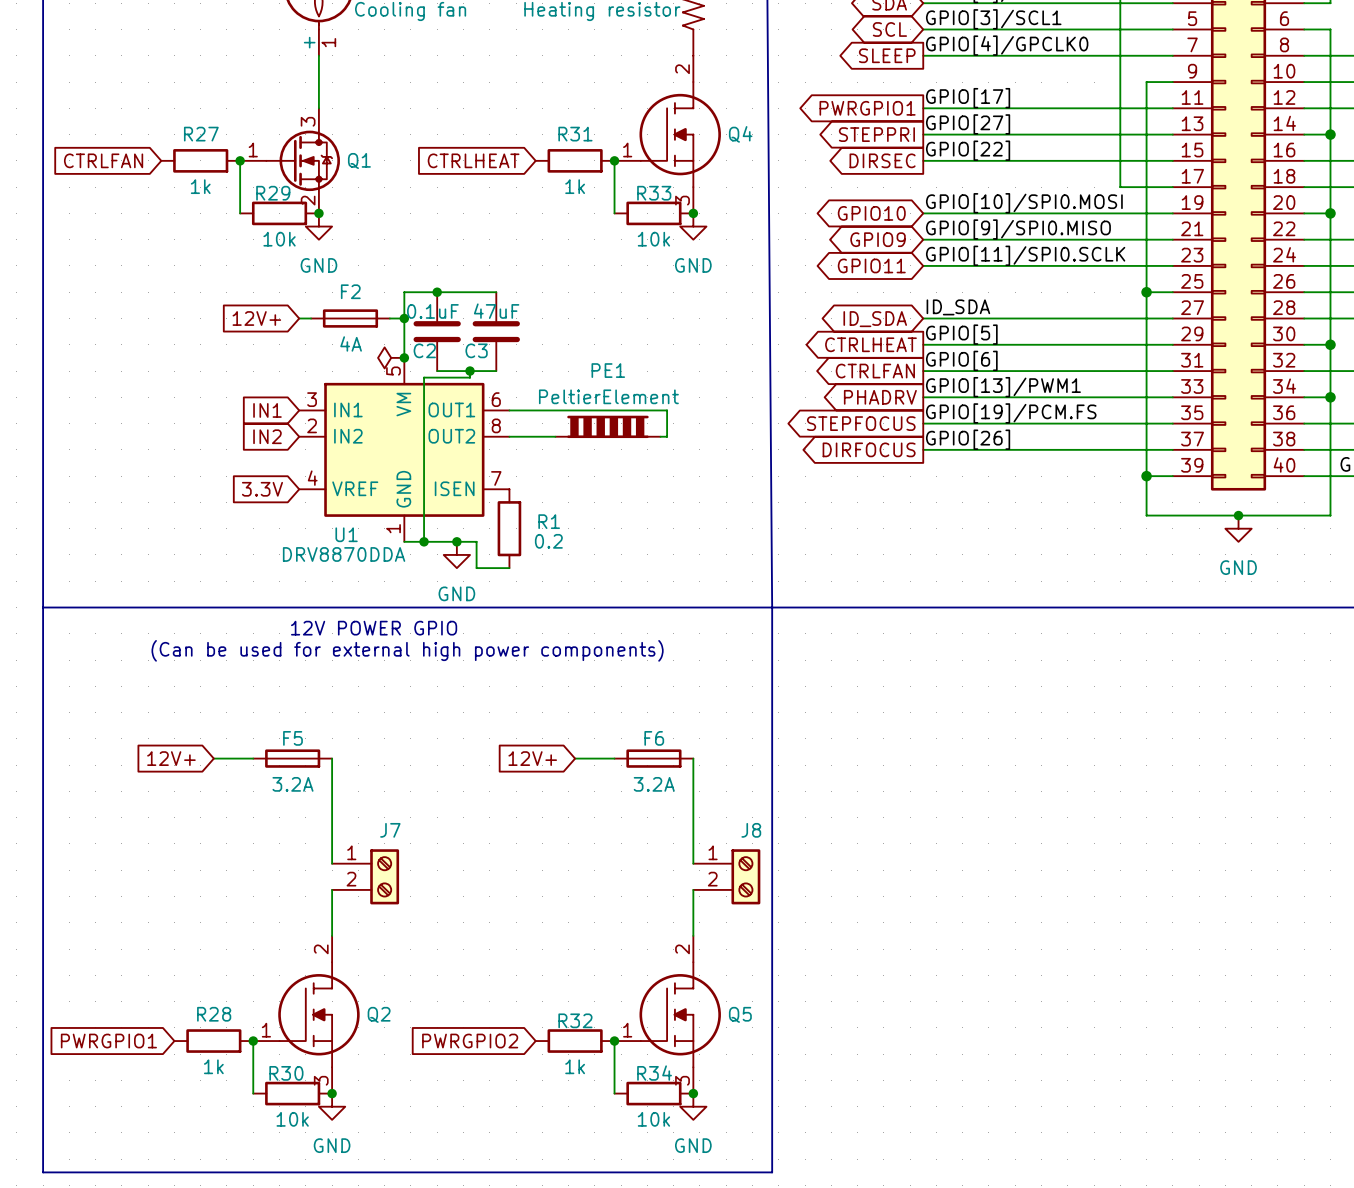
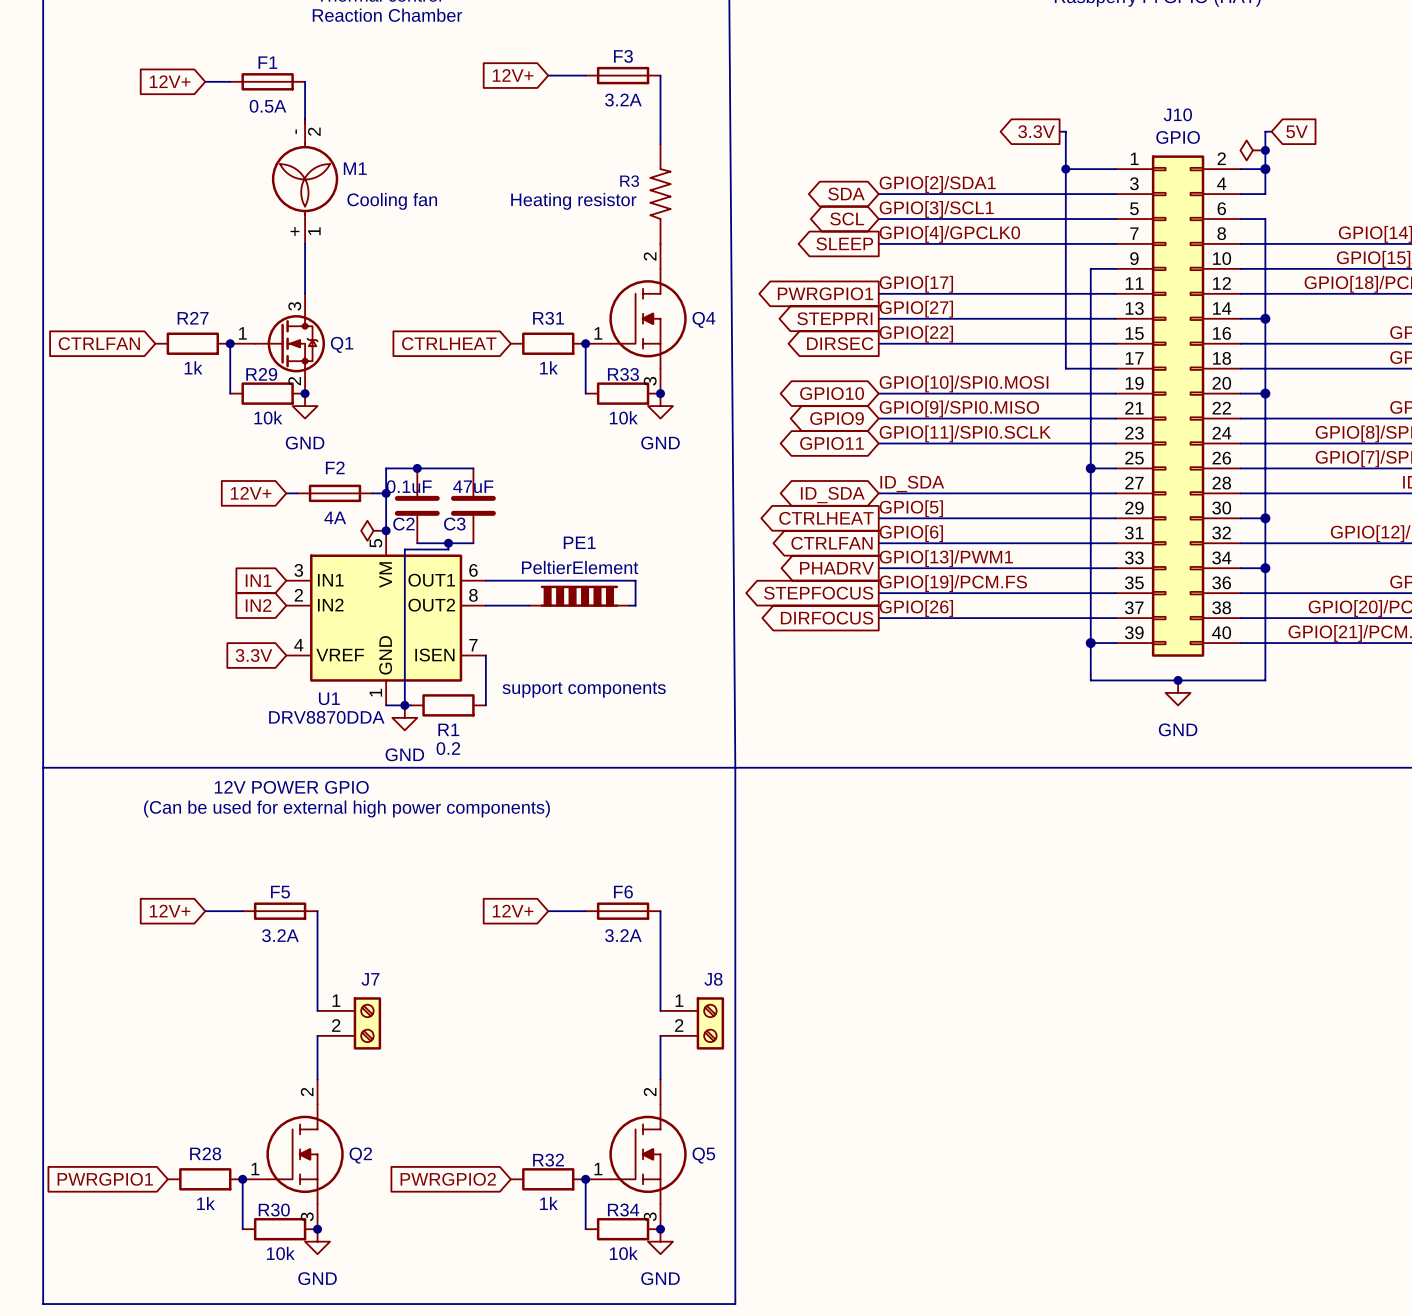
wire: none -> (485, 655) (485, 705)
text: none -> support components (584, 689)
R1 rotation: 0° (509, 528) -> 90° clockwise (448, 705)
wire: (430, 541) (476, 541) (476, 568) (509, 568) -> none
junction: (456, 541) -> none
power symbol position: GND (456, 554) -> GND (404, 717)

